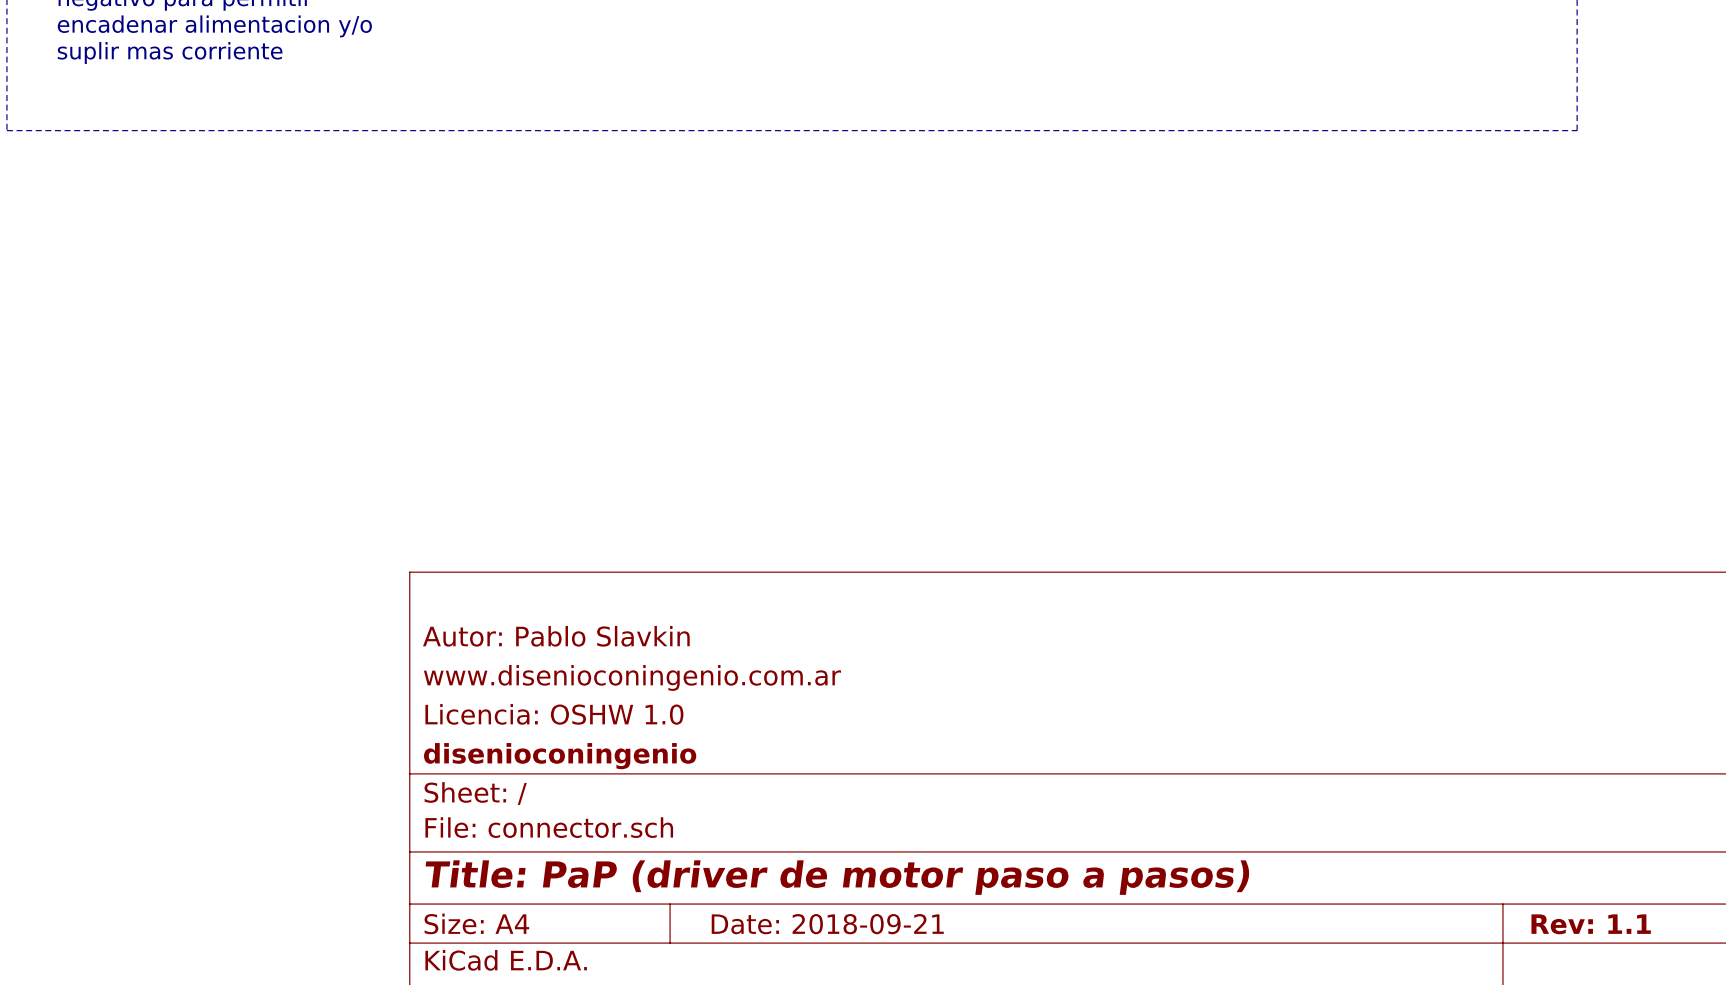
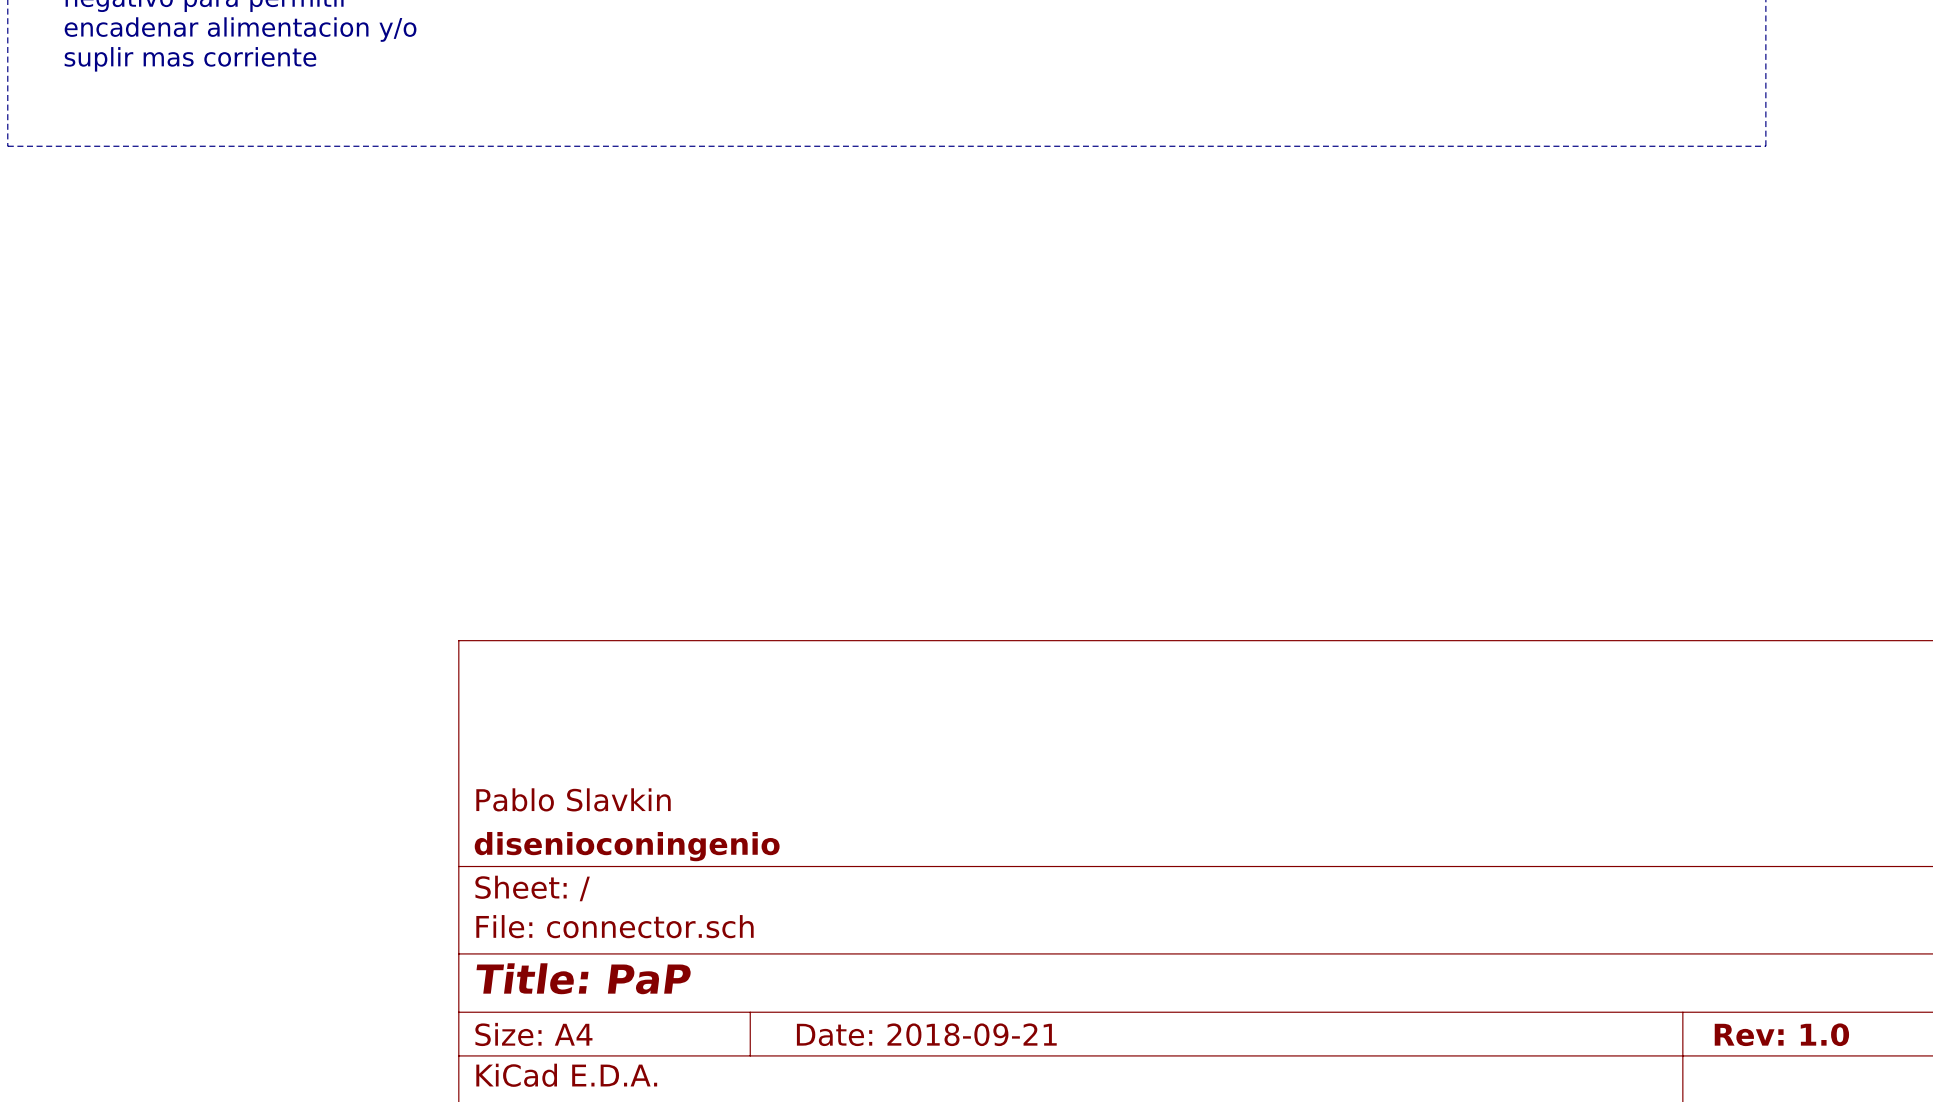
title block: Autor: Pablo Slavkin (556, 636) -> none
title block: www.disenioconingenio.com.ar (632, 677) -> none
title block: Licencia: OSHW 1.0 (554, 714) -> Pablo Slavkin (573, 799)
title block: Title: PaP (driver de motor paso a pasos) (837, 877) -> Title: PaP (583, 978)
title block: Rev: 1.1 (1591, 924) -> Rev: 1.0 (1781, 1034)

